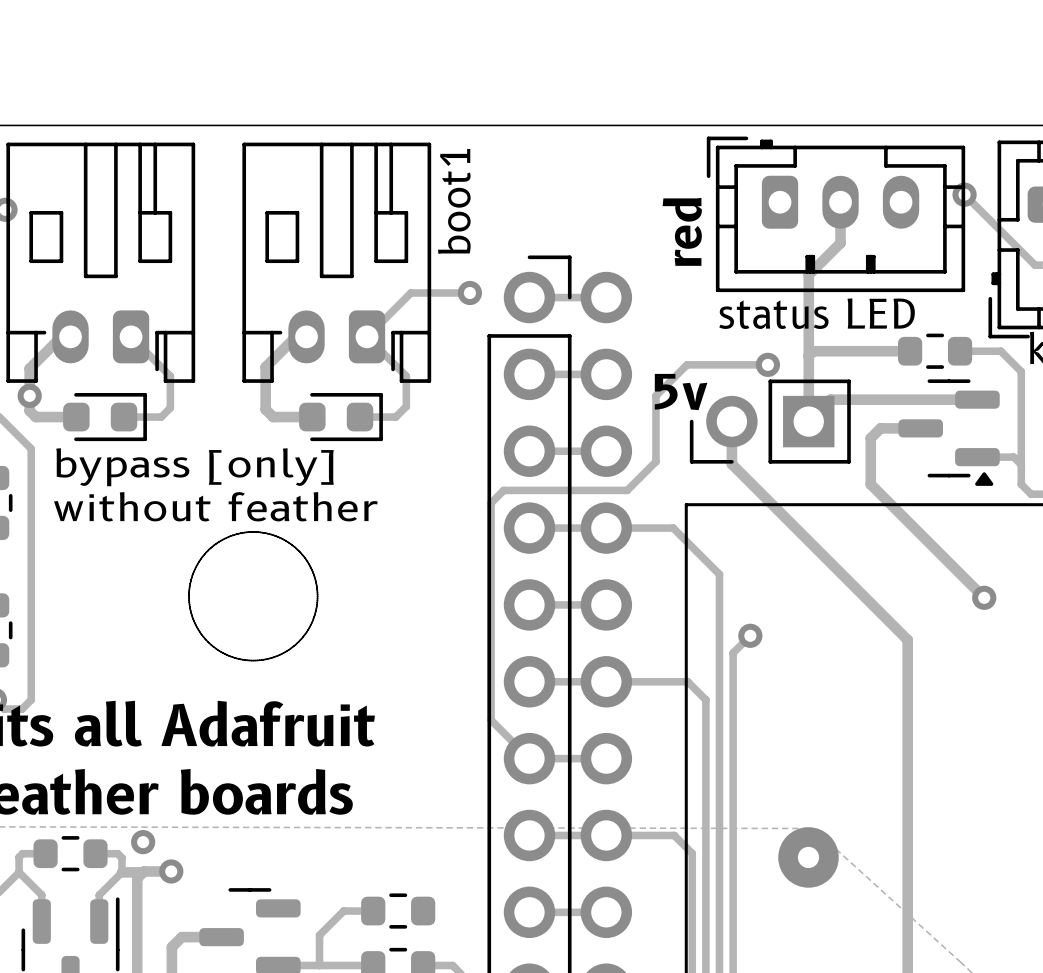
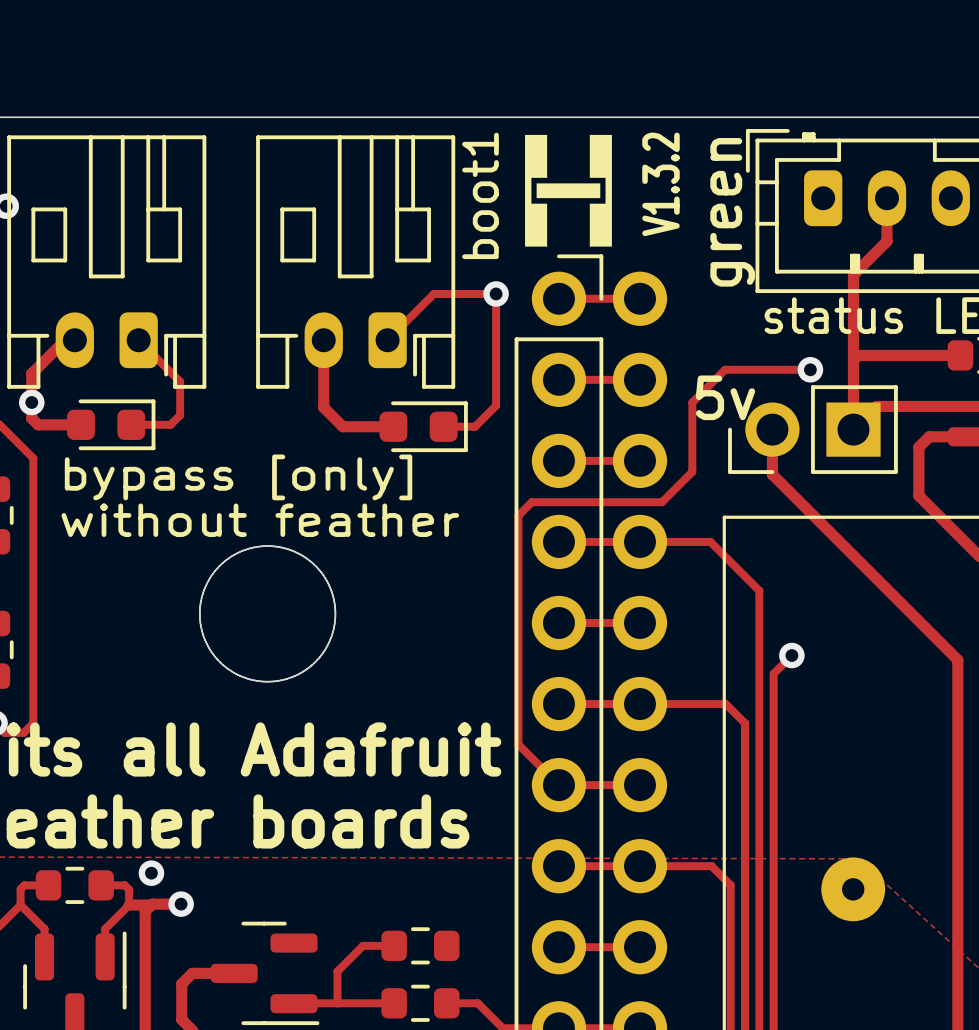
drawing: none -> [525, 134, 612, 247]
text: none -> V1.3.2 (660, 184)
text: red (682, 231) -> green (732, 212)
track: none -> (496, 293) (496, 405) (475, 426) (443, 426)
track: (295, 336) (265, 367) (265, 409) (273, 417) (312, 417) -> none
track: none -> (323, 340) (323, 407) (342, 426) (393, 426)
track: (367, 336) (406, 376) (406, 406) (395, 417) (360, 417) -> none
part position: (341, 417) -> (423, 426)

